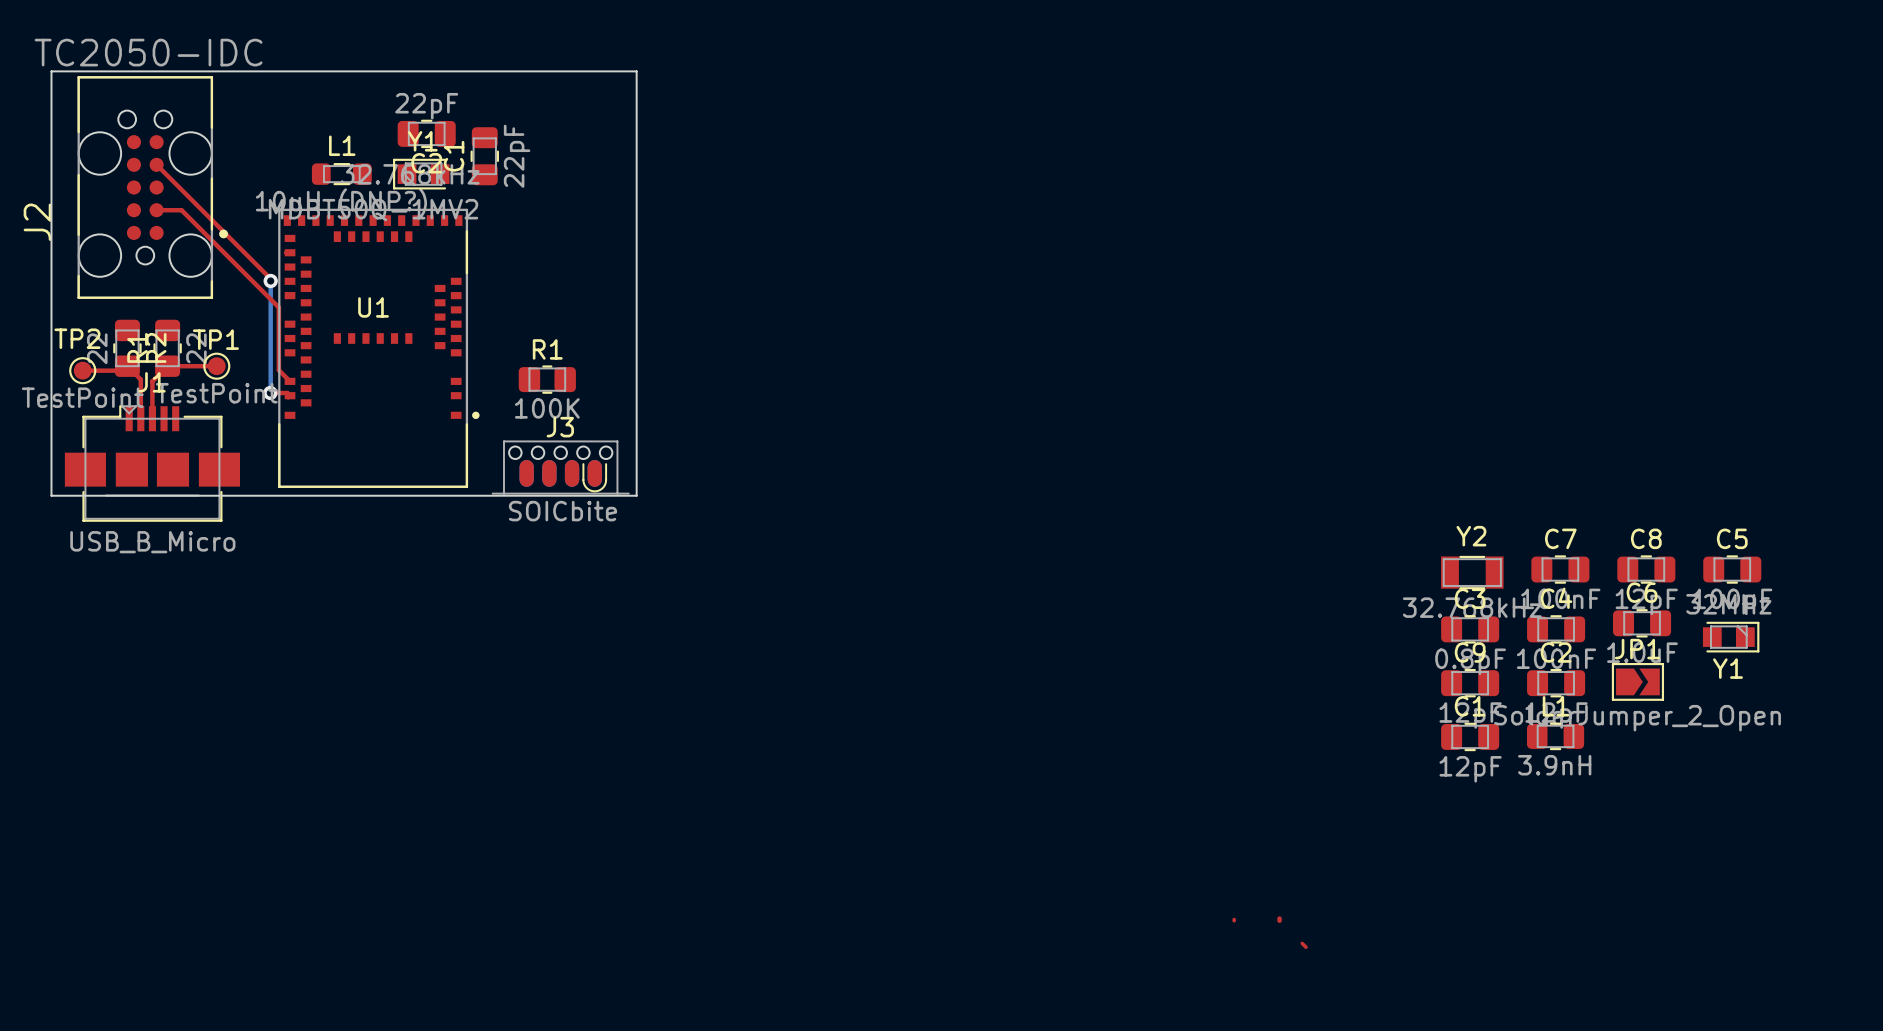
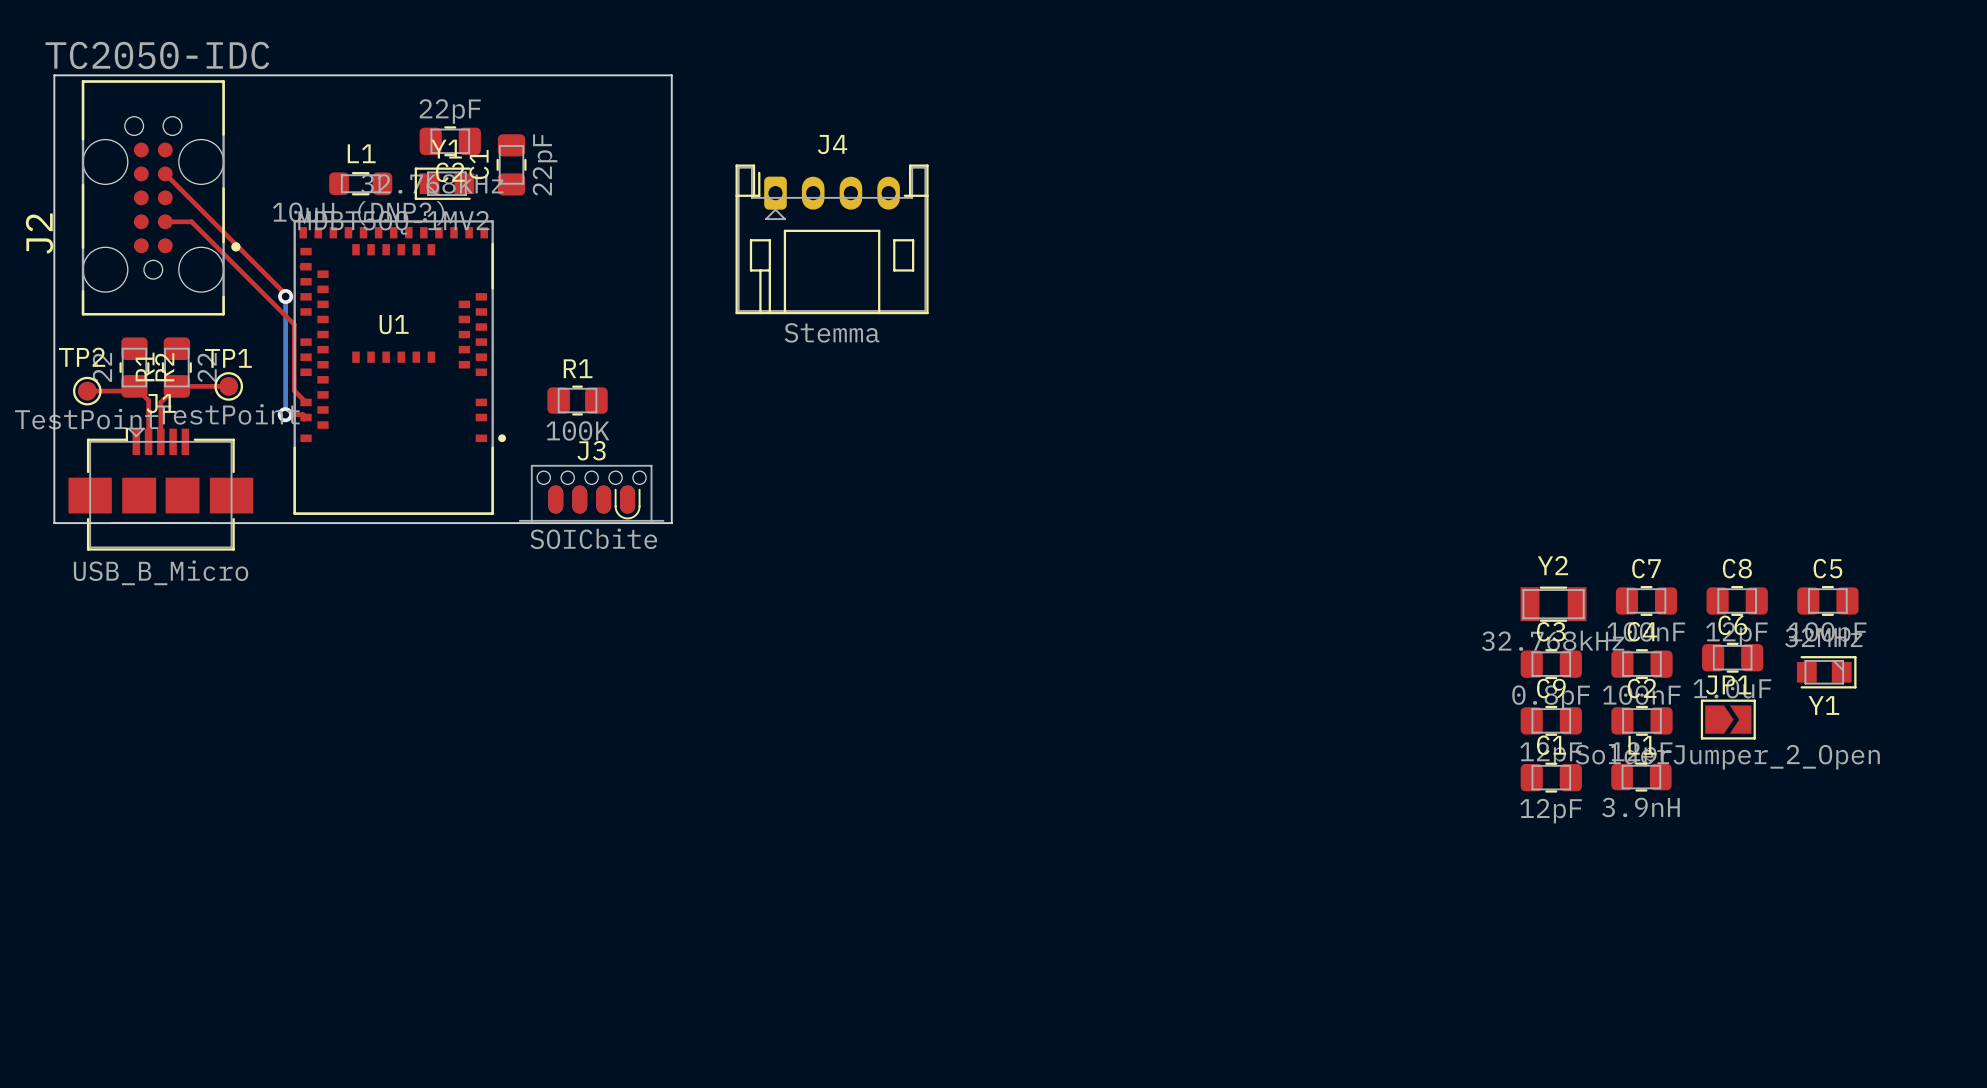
J4: none -> Stemma (832, 239)
top track: (1279, 918) (1279, 920) -> none
top track: (1234, 919) (1234, 920) -> none
top track: (1302, 943) (1305, 947) -> none

